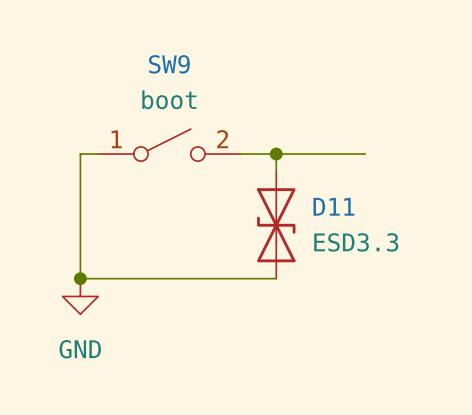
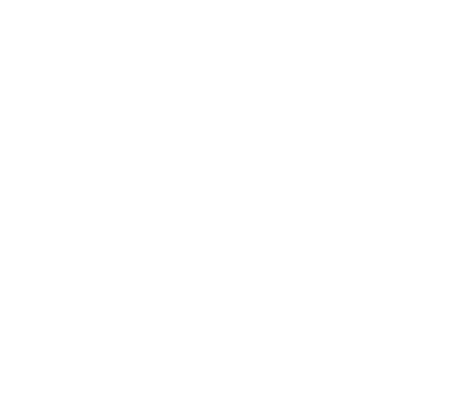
SW9: boot (169, 145) -> none
wire: (98, 154) (80, 154) (80, 278) (276, 278) -> none
wire: (240, 154) (365, 154) -> none
wire: (276, 154) (276, 171) -> none
junction: (276, 154) -> none
D11: ESD3.3 (276, 225) -> none
junction: (80, 278) -> none
power symbol: GND (80, 296) -> none

